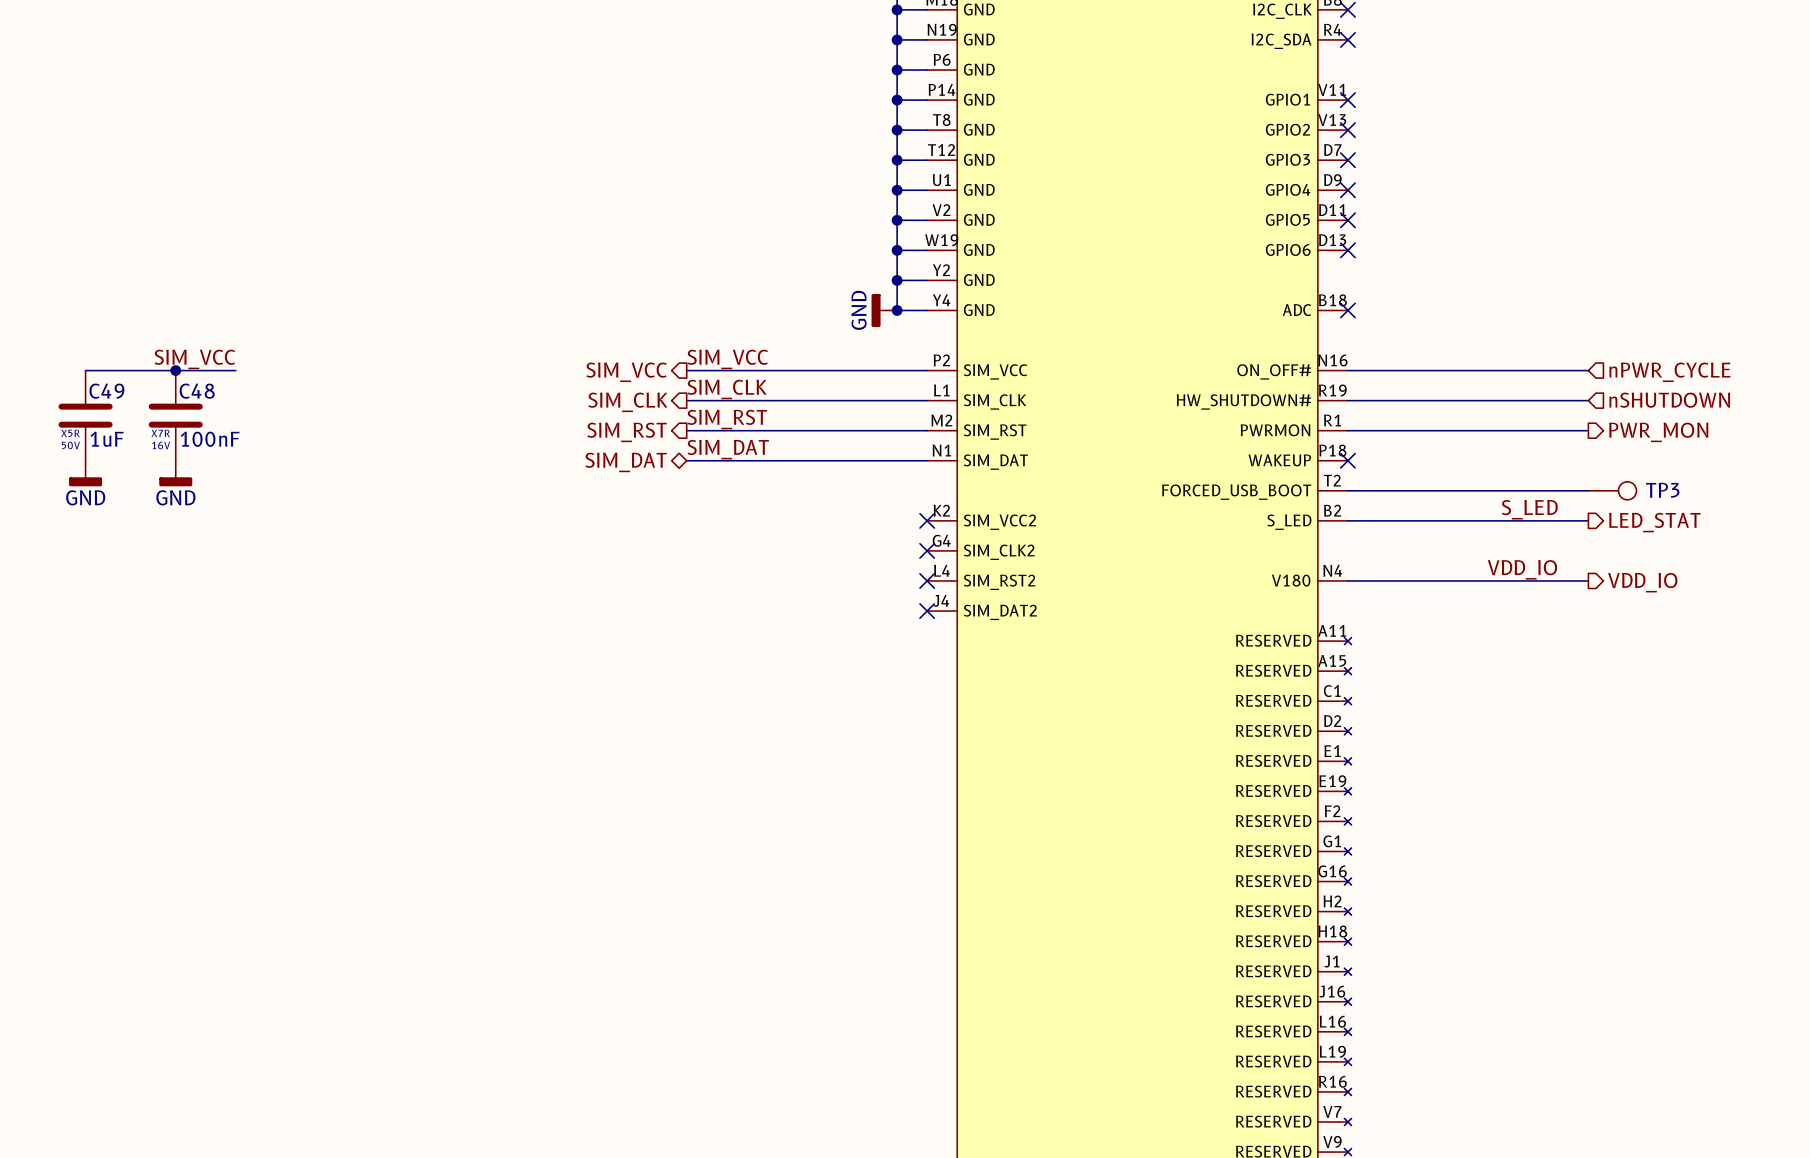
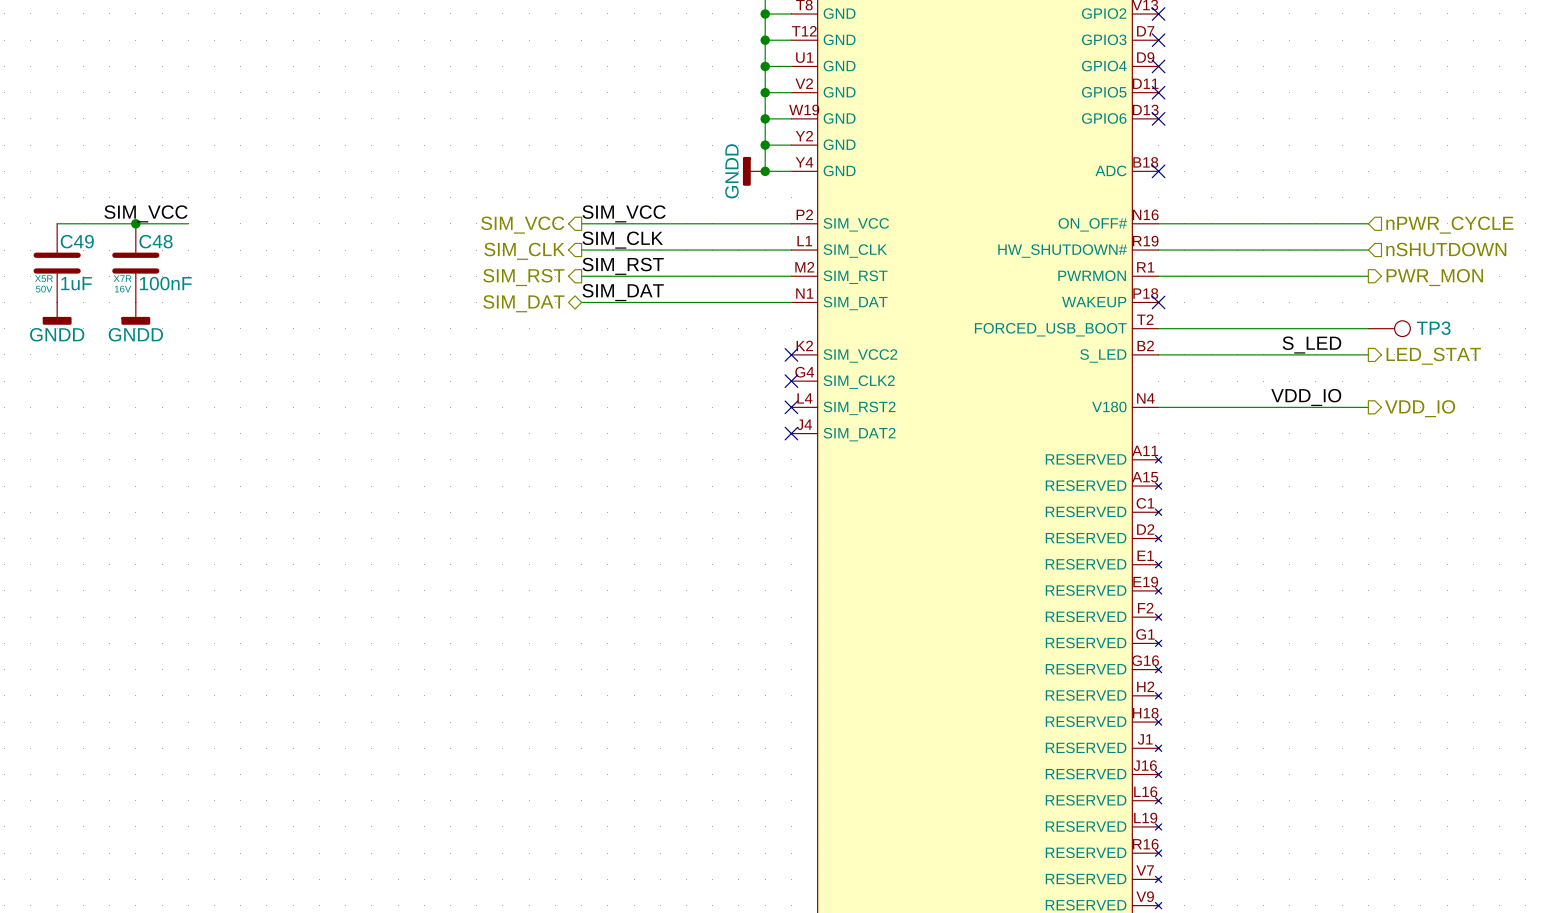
power symbol: GND (884, 310) -> GNDD (754, 171)
power symbol: GND (85, 473) -> GNDD (57, 313)
power symbol: GND (175, 473) -> GNDD (135, 313)

